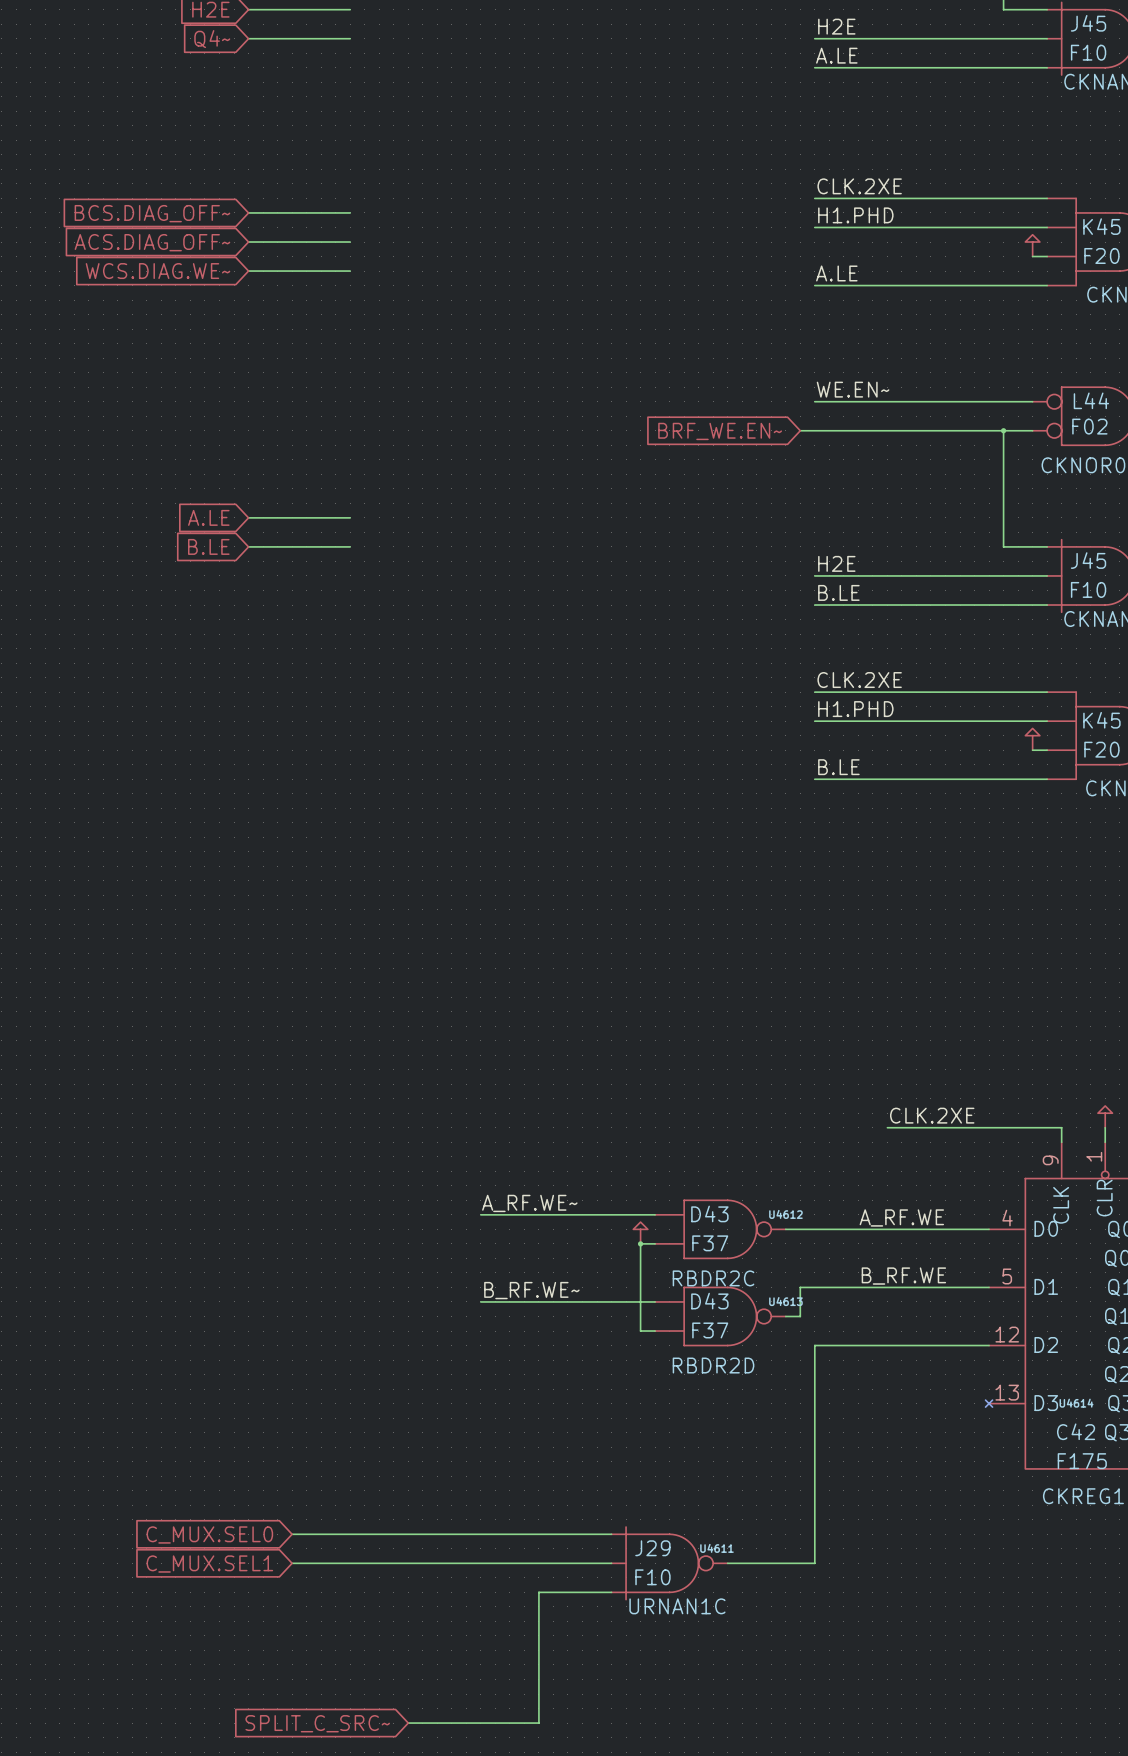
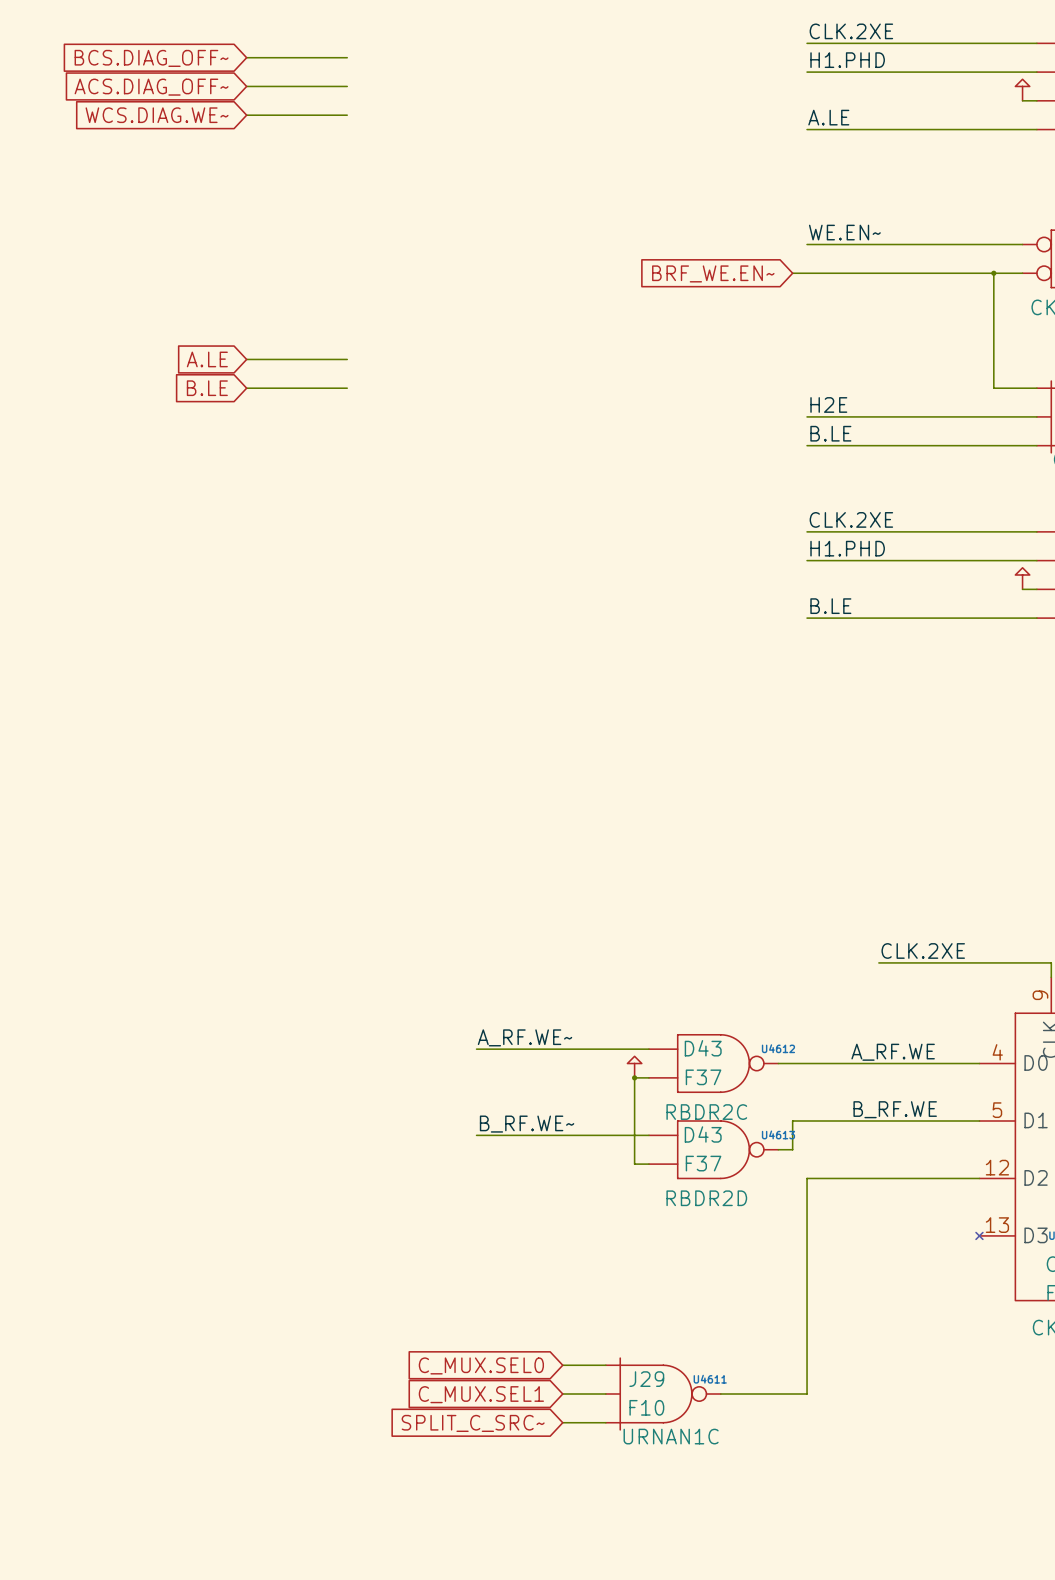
global label: C_MUX.SEL0 (209, 1534) -> none
wire: (292, 1534) (567, 1534) -> none
global label: none -> C_MUX.SEL0 (481, 1365)
wire: (292, 1563) (567, 1563) -> none
global label: C_MUX.SEL1 (209, 1564) -> none
global label: none -> C_MUX.SEL1 (481, 1394)
wire: (567, 1592) (538, 1592) (538, 1723) (408, 1723) -> none
global label: none -> SPLIT_C_SRC~ (473, 1423)
global label: SPLIT_C_SRC~ (317, 1723) -> none

